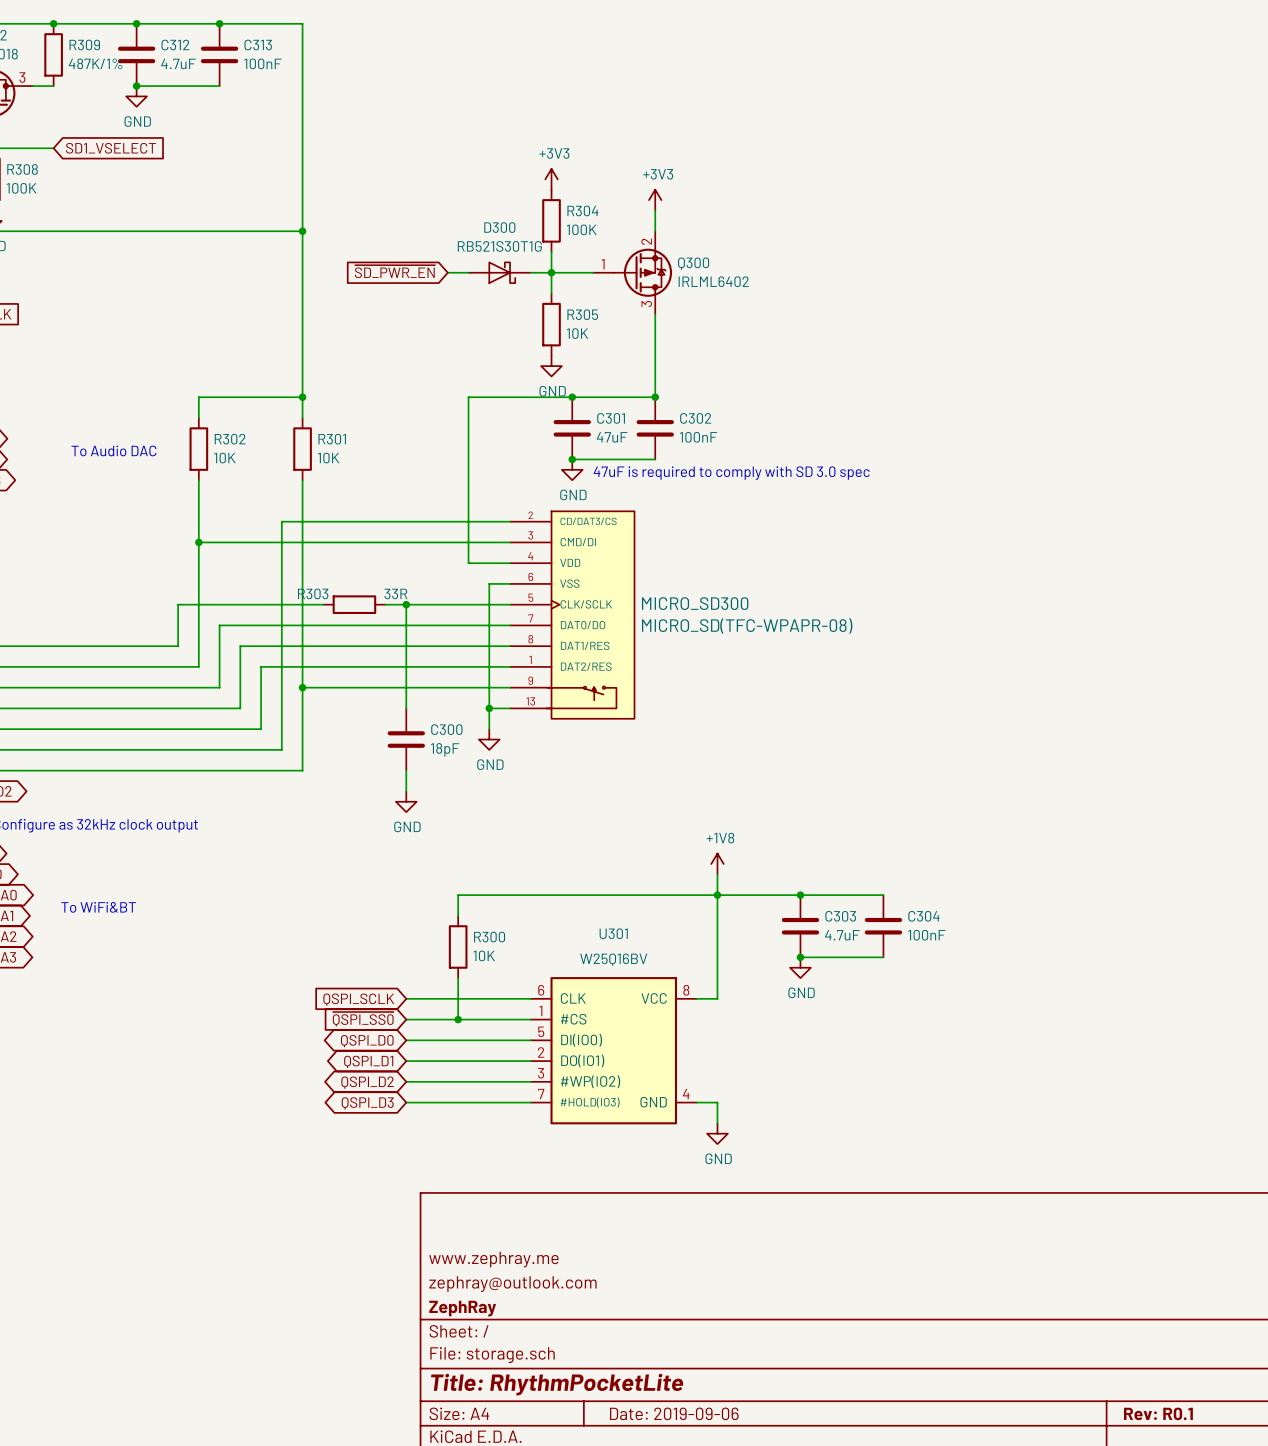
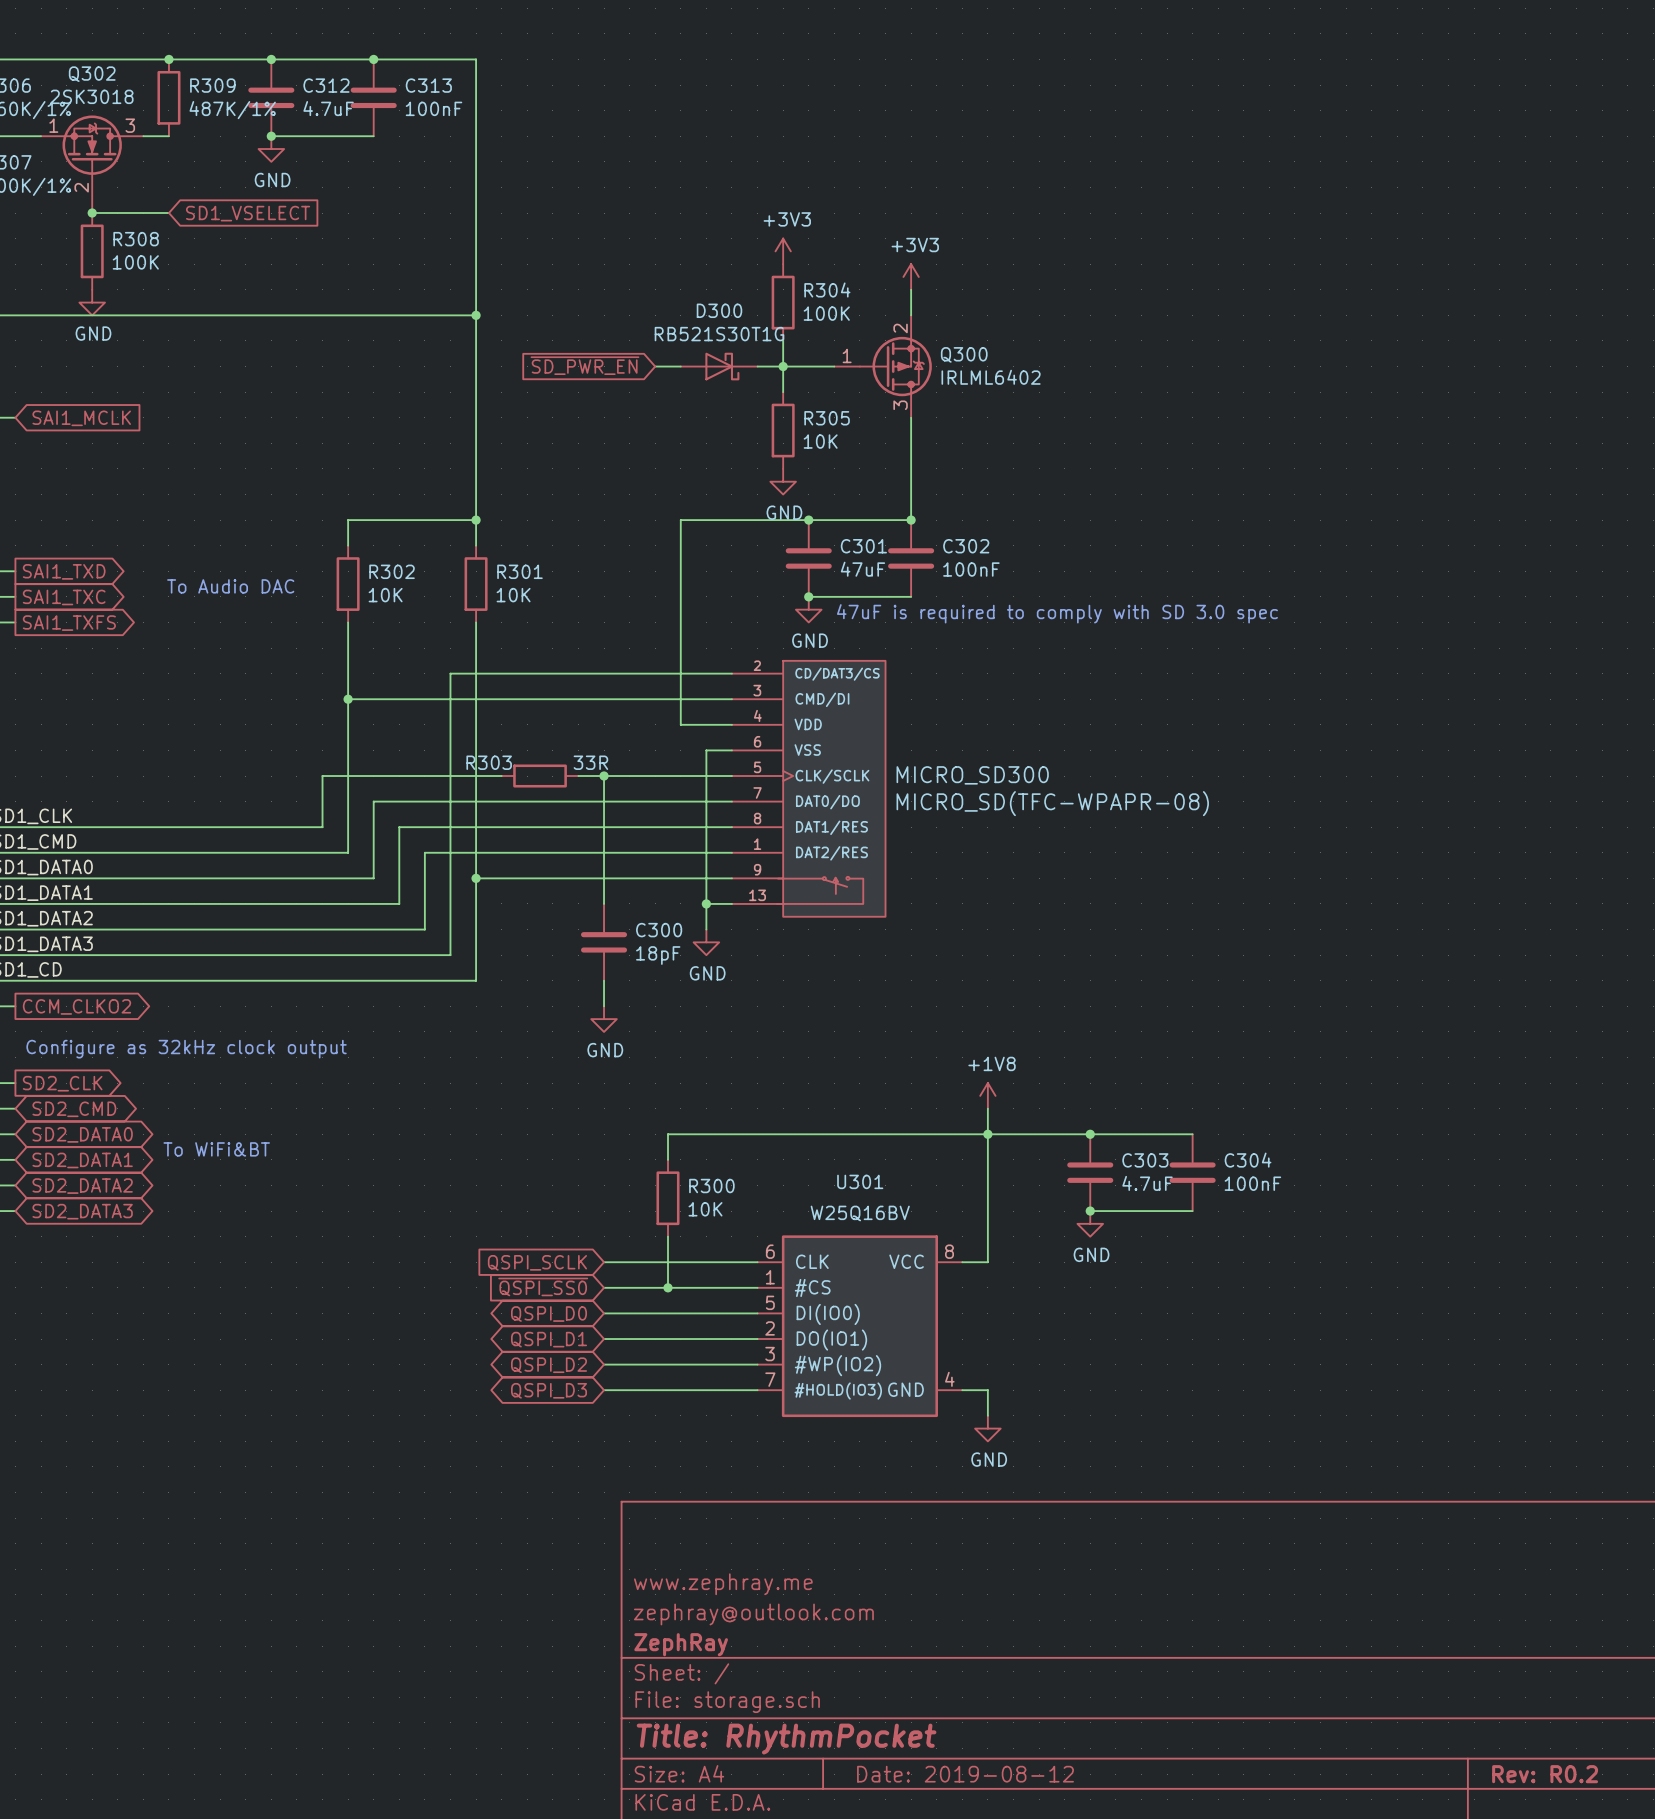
title block: Title: RhythmPocketLite (557, 1384) -> Title: RhythmPocket (786, 1739)
title block: Date: 2019-09-06 (674, 1413) -> Date: 2019-08-12 (965, 1774)
title block: Rev: R0.1 (1158, 1413) -> Rev: R0.2 (1545, 1774)

